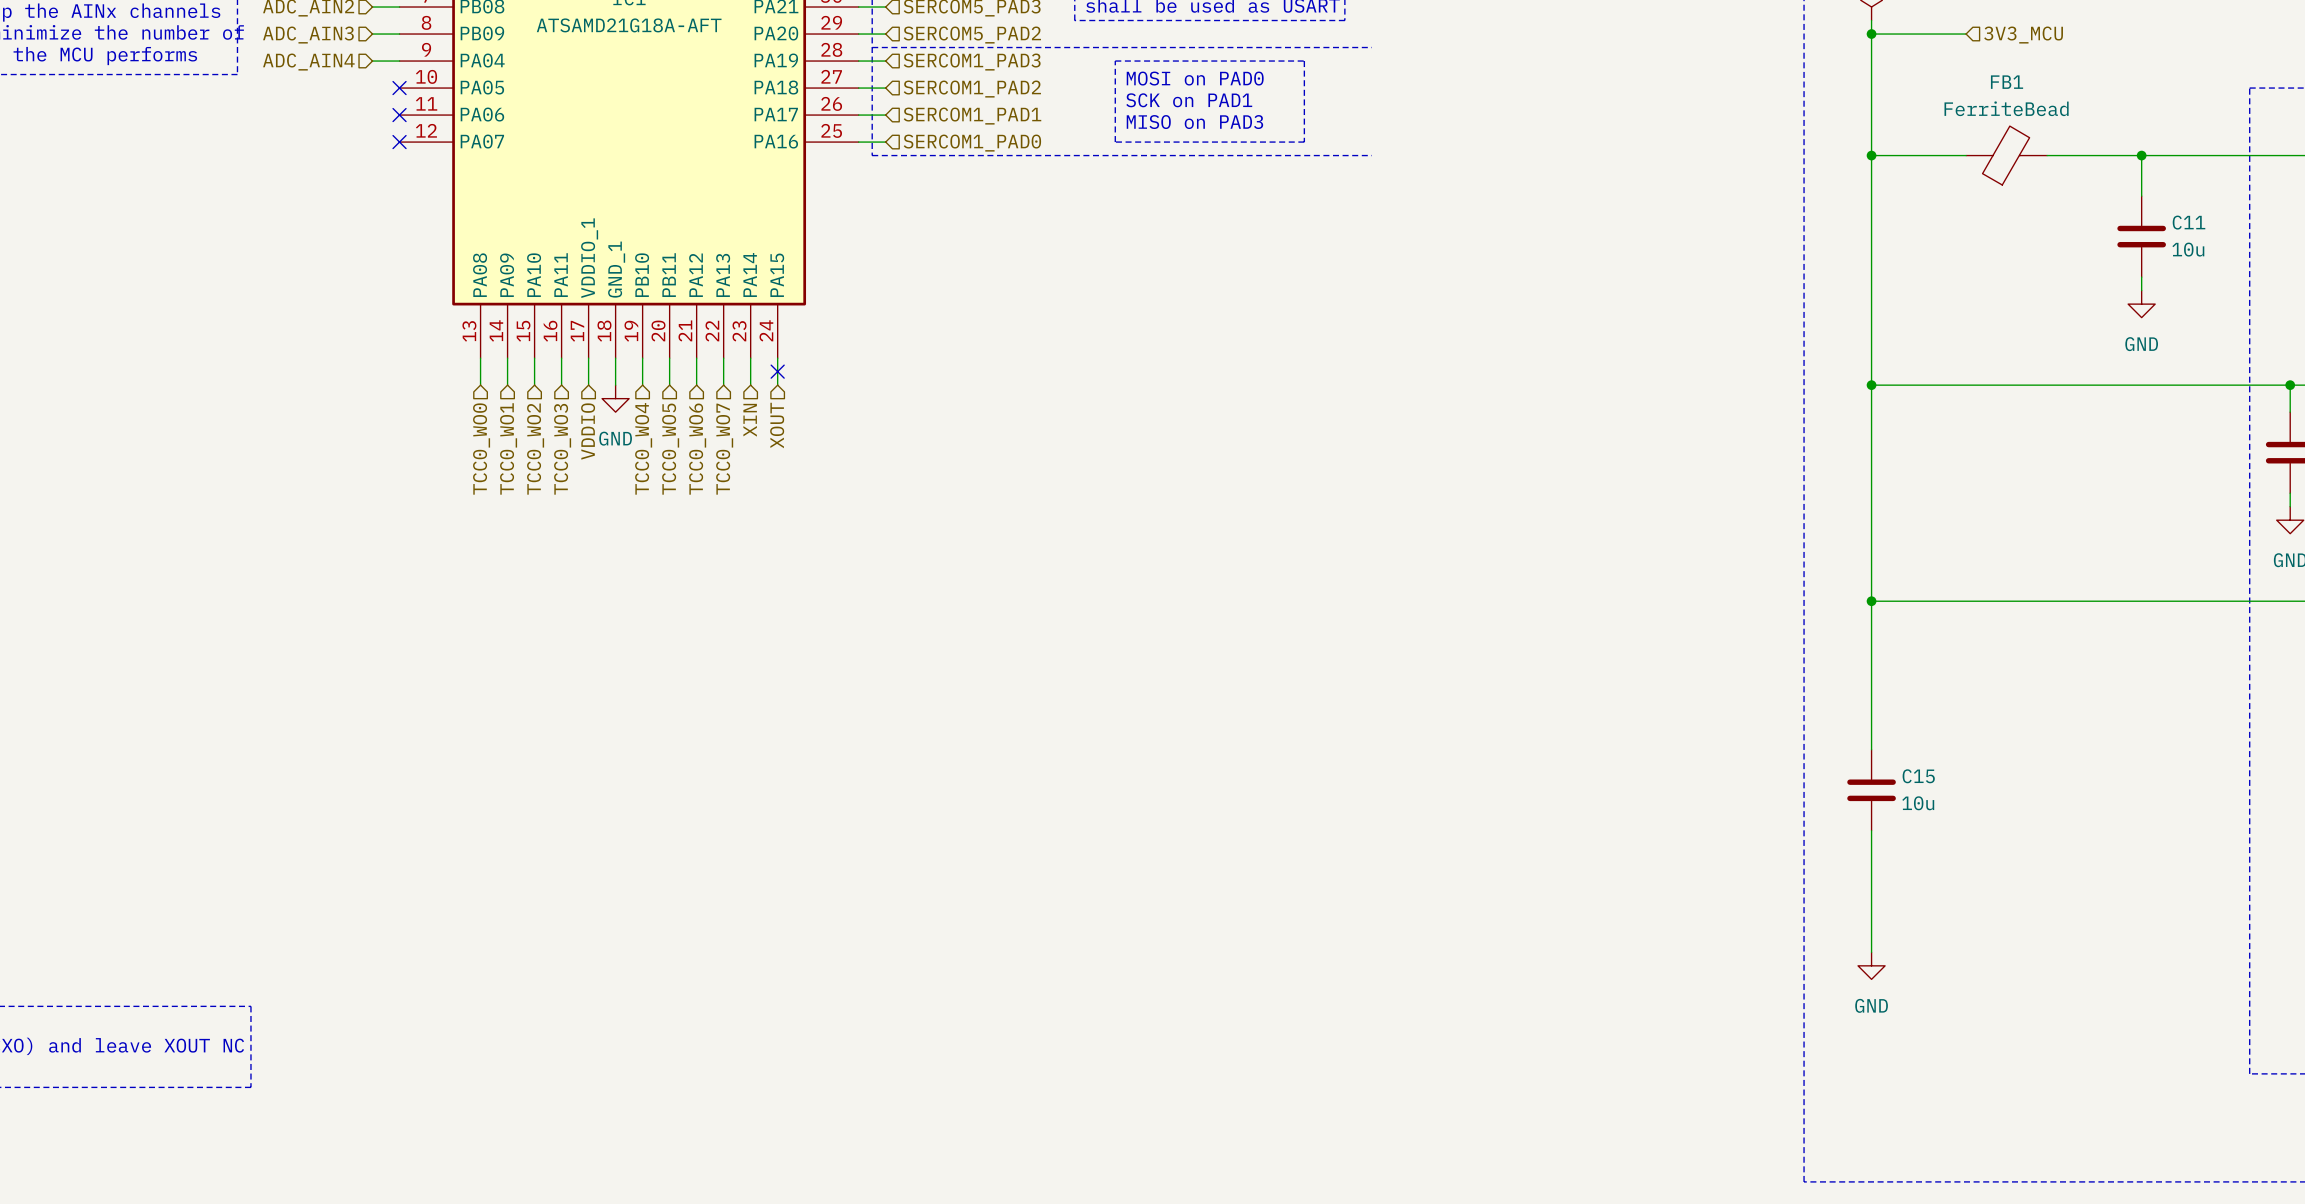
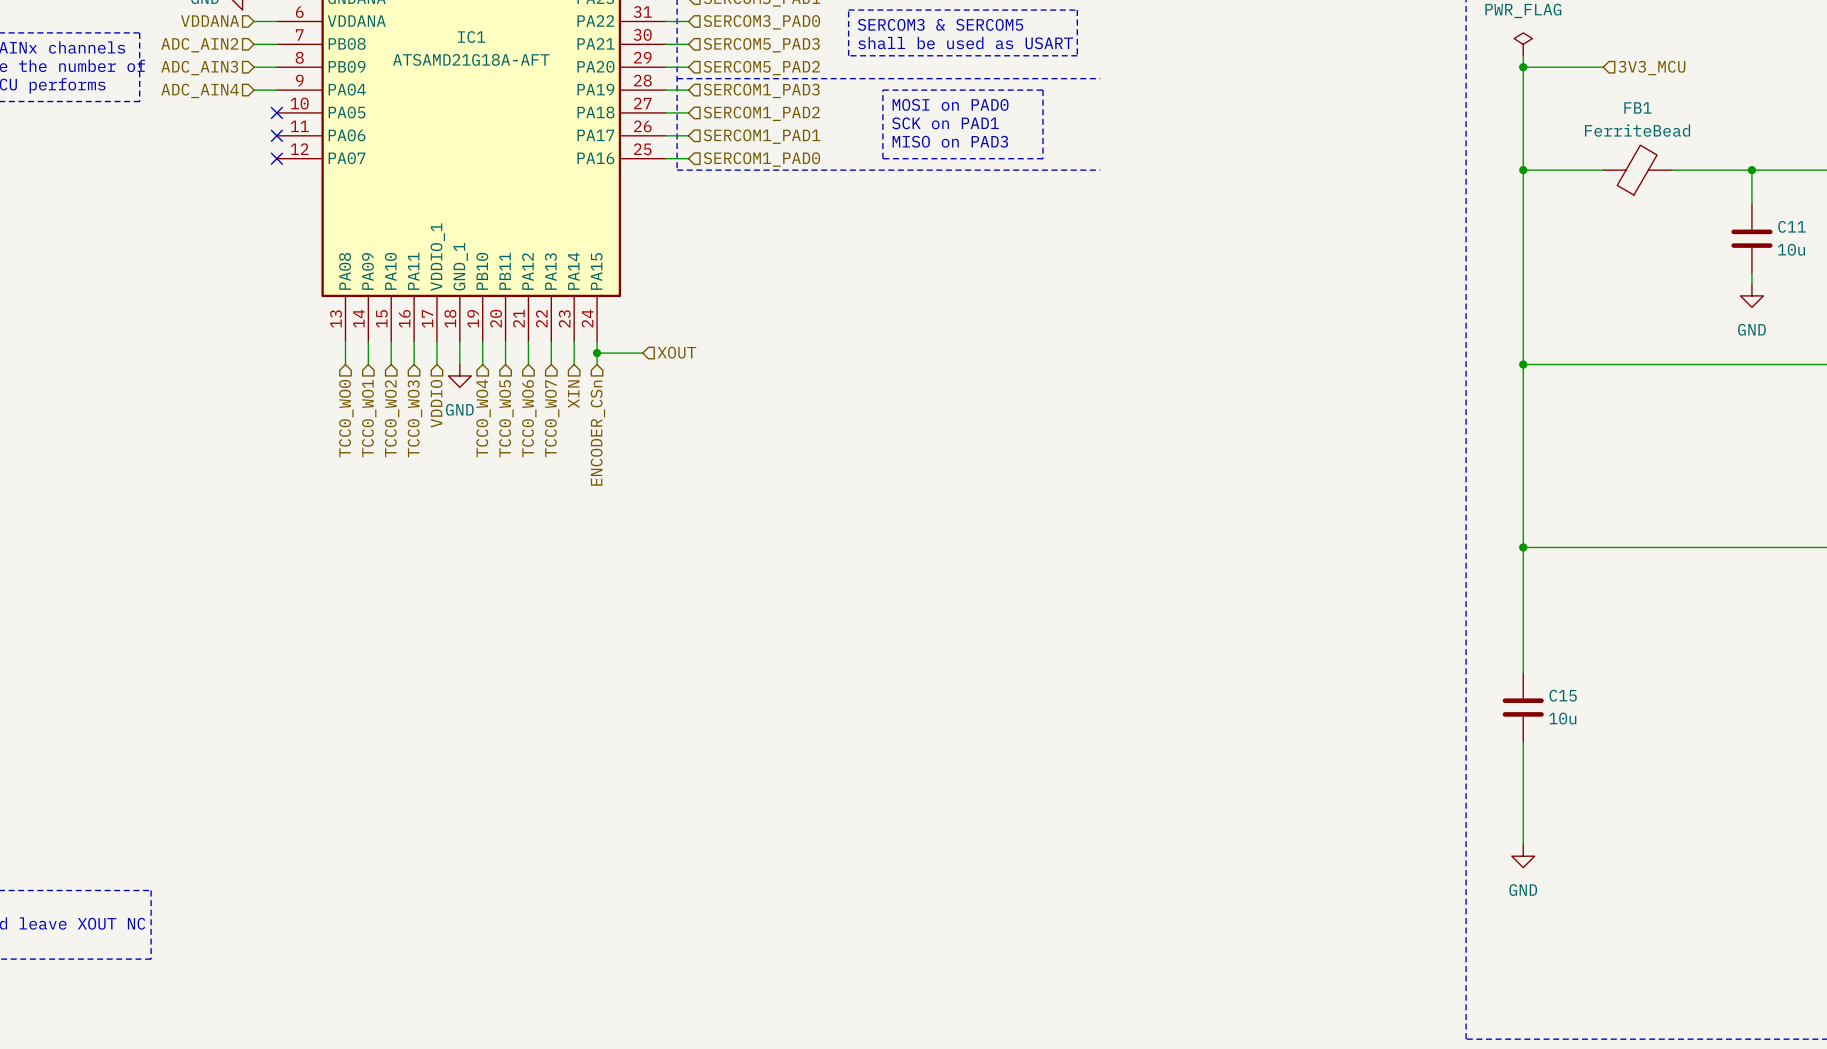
wire: none -> (597, 353) (642, 353)
no-connect mark: (777, 371) -> none
junction: none -> (597, 353)
hierarchical label: none -> XOUT (676, 352)
hierarchical label: XOUT (777, 425) -> ENCODER_CSn (597, 433)

